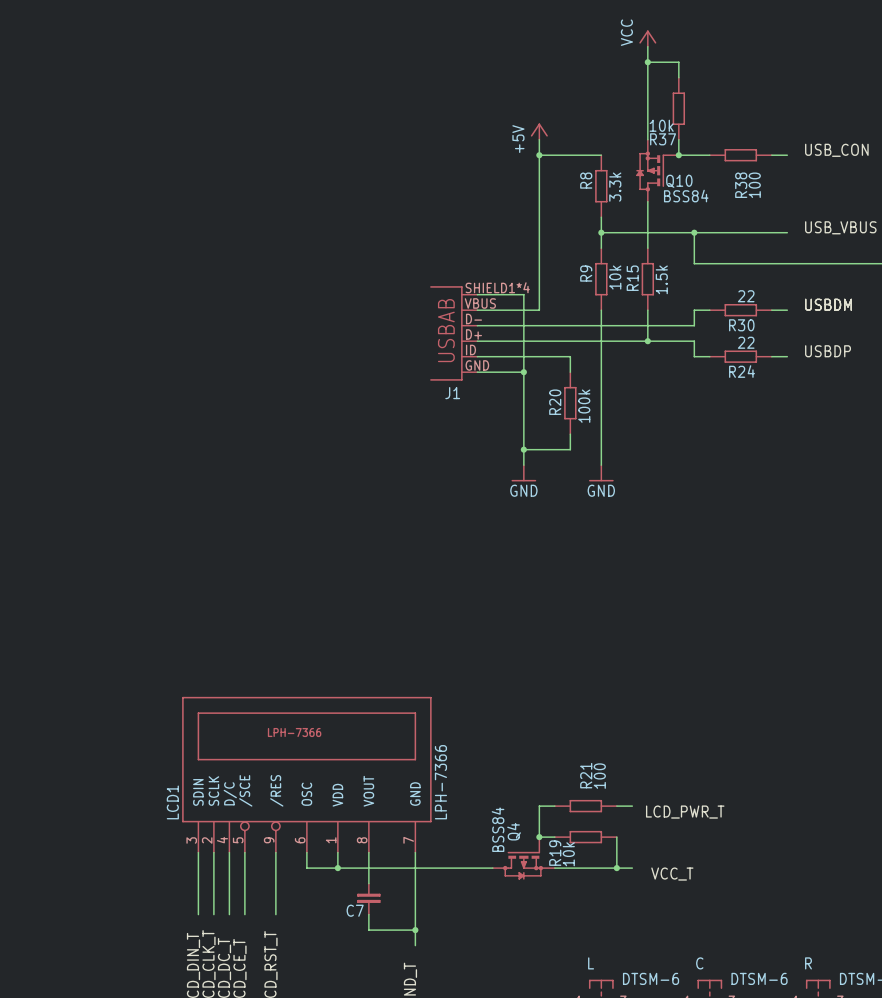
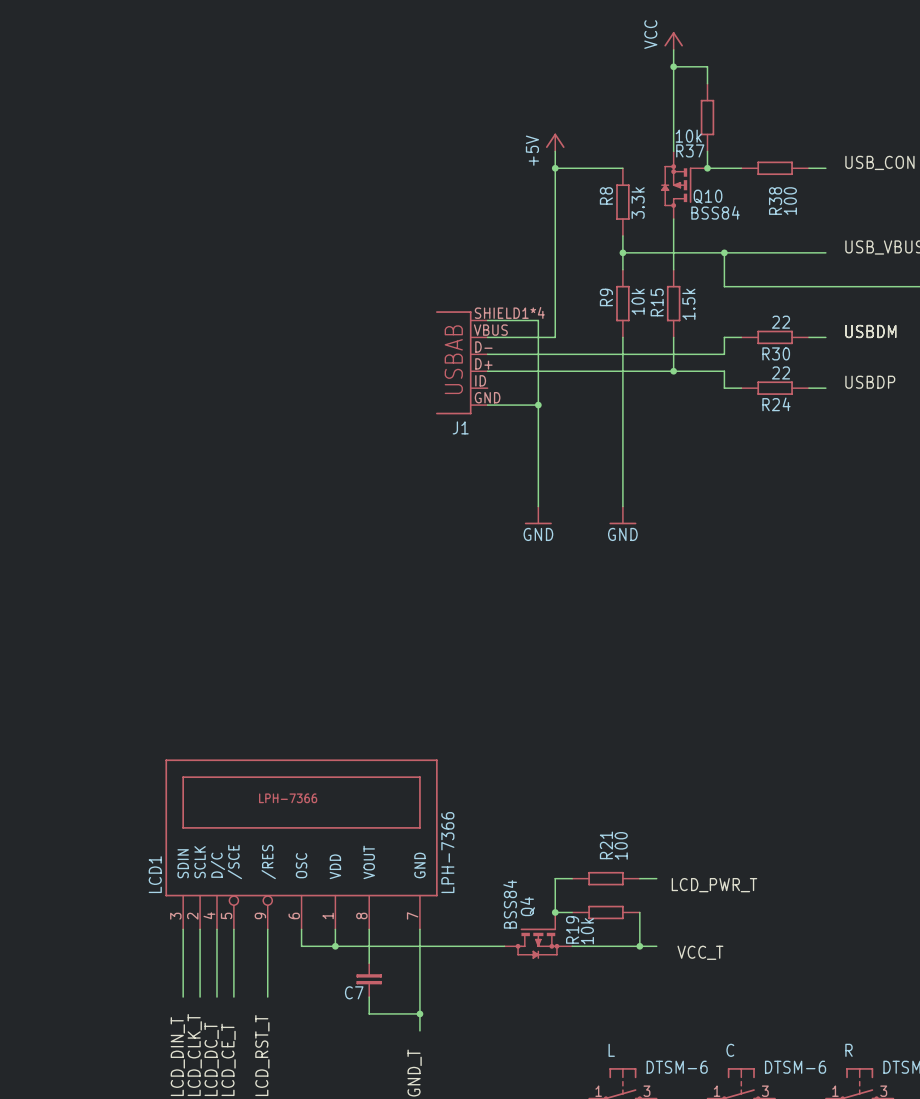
wire: (477, 356) (570, 356) (570, 372) -> none
R20: 100k (570, 403) -> none
wire: (570, 434) (570, 449) (523, 449) -> none
junction: (523, 449) -> none

